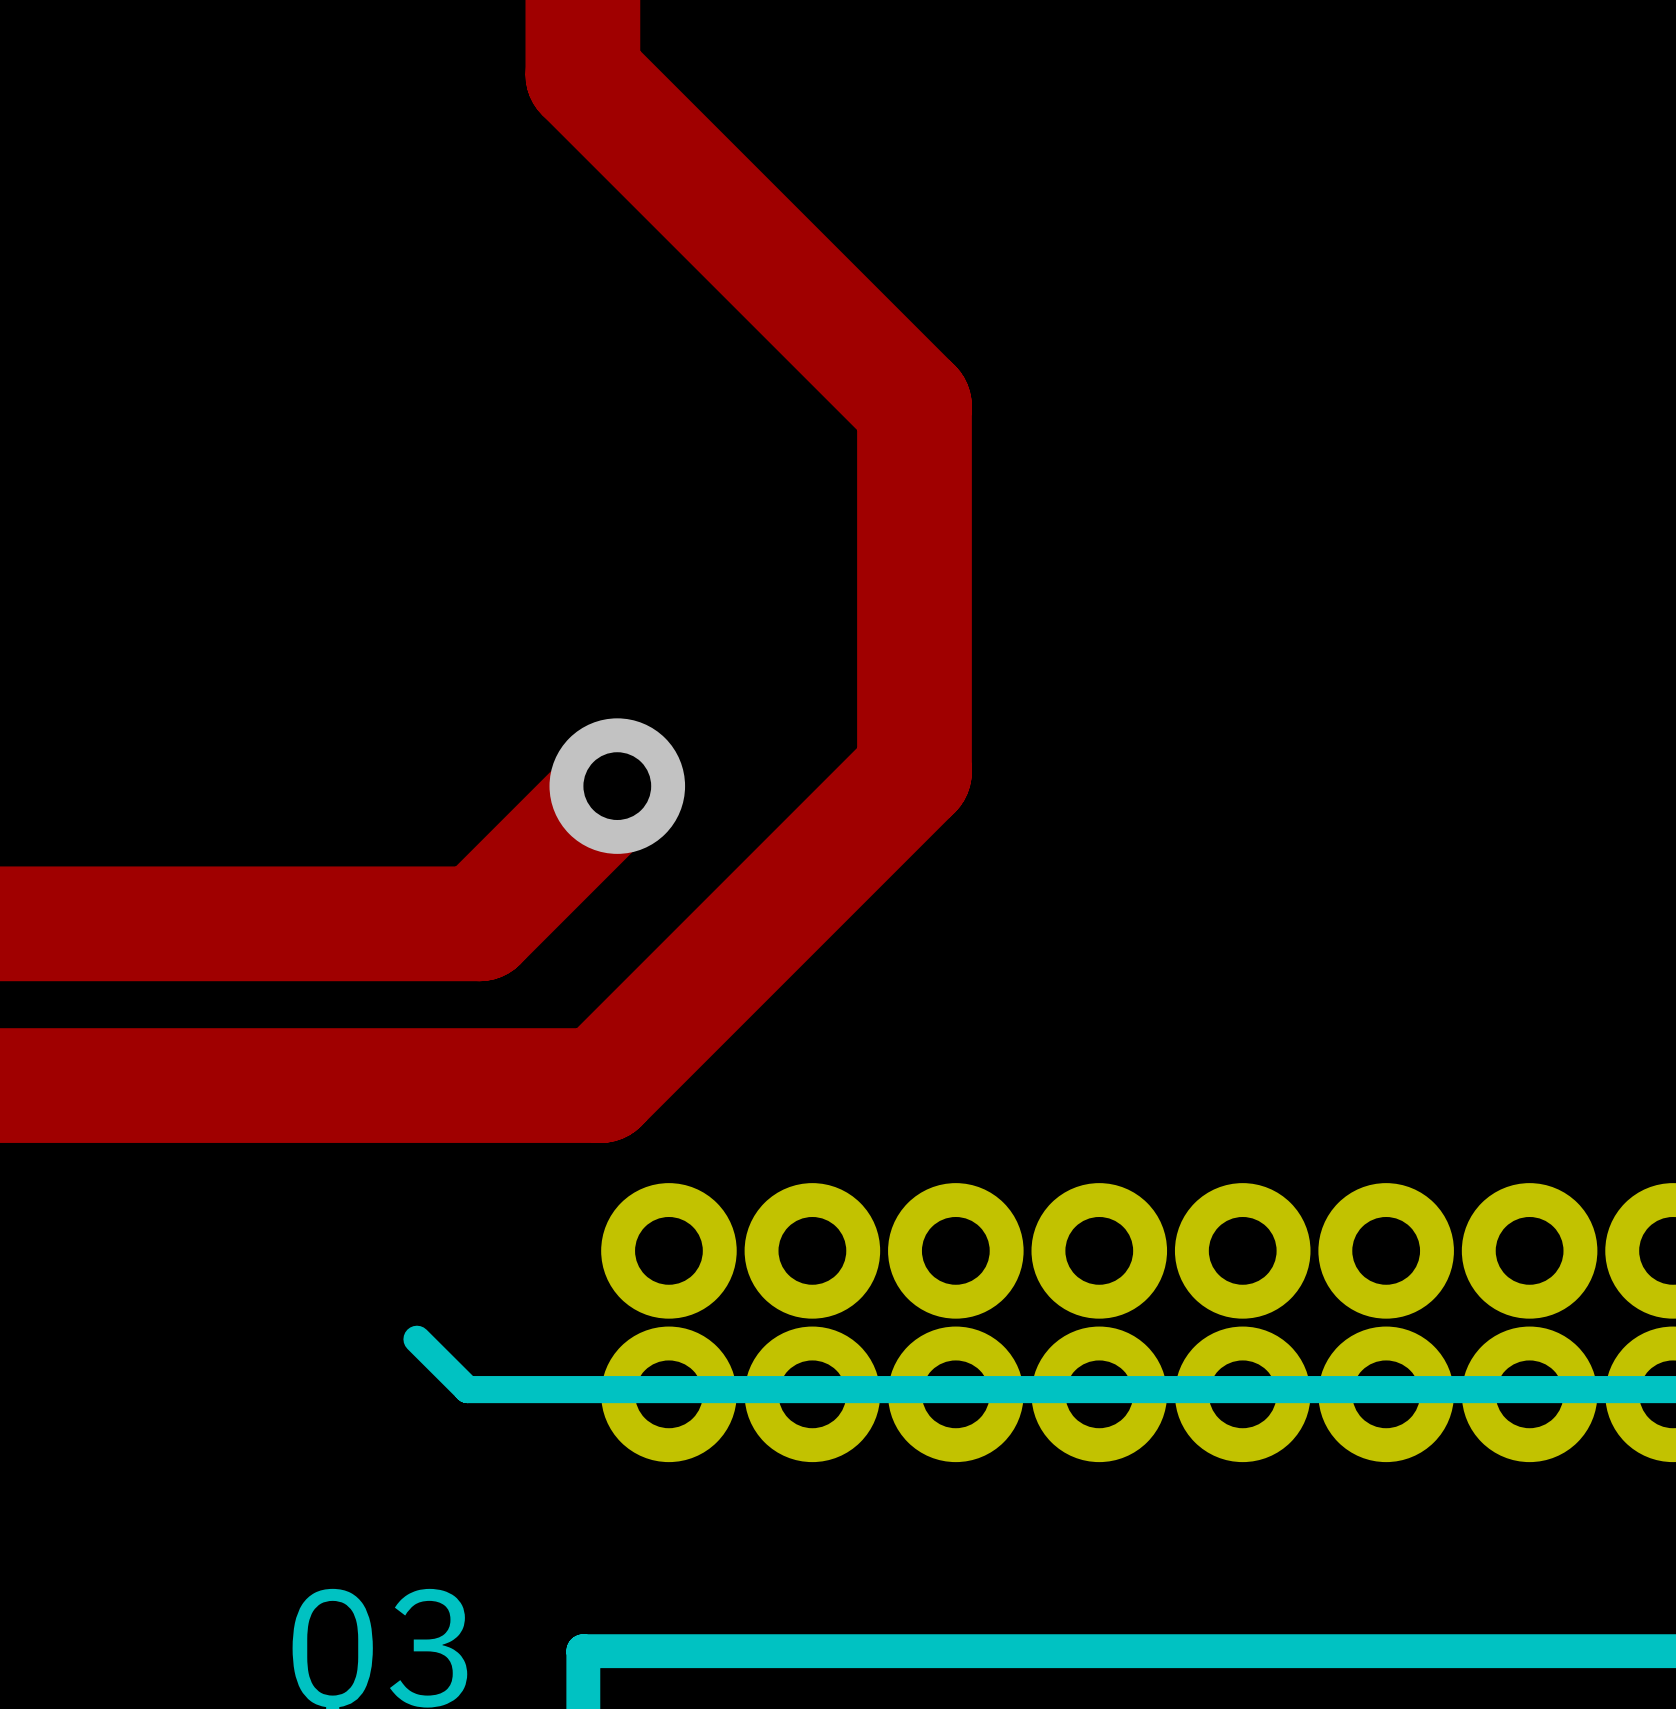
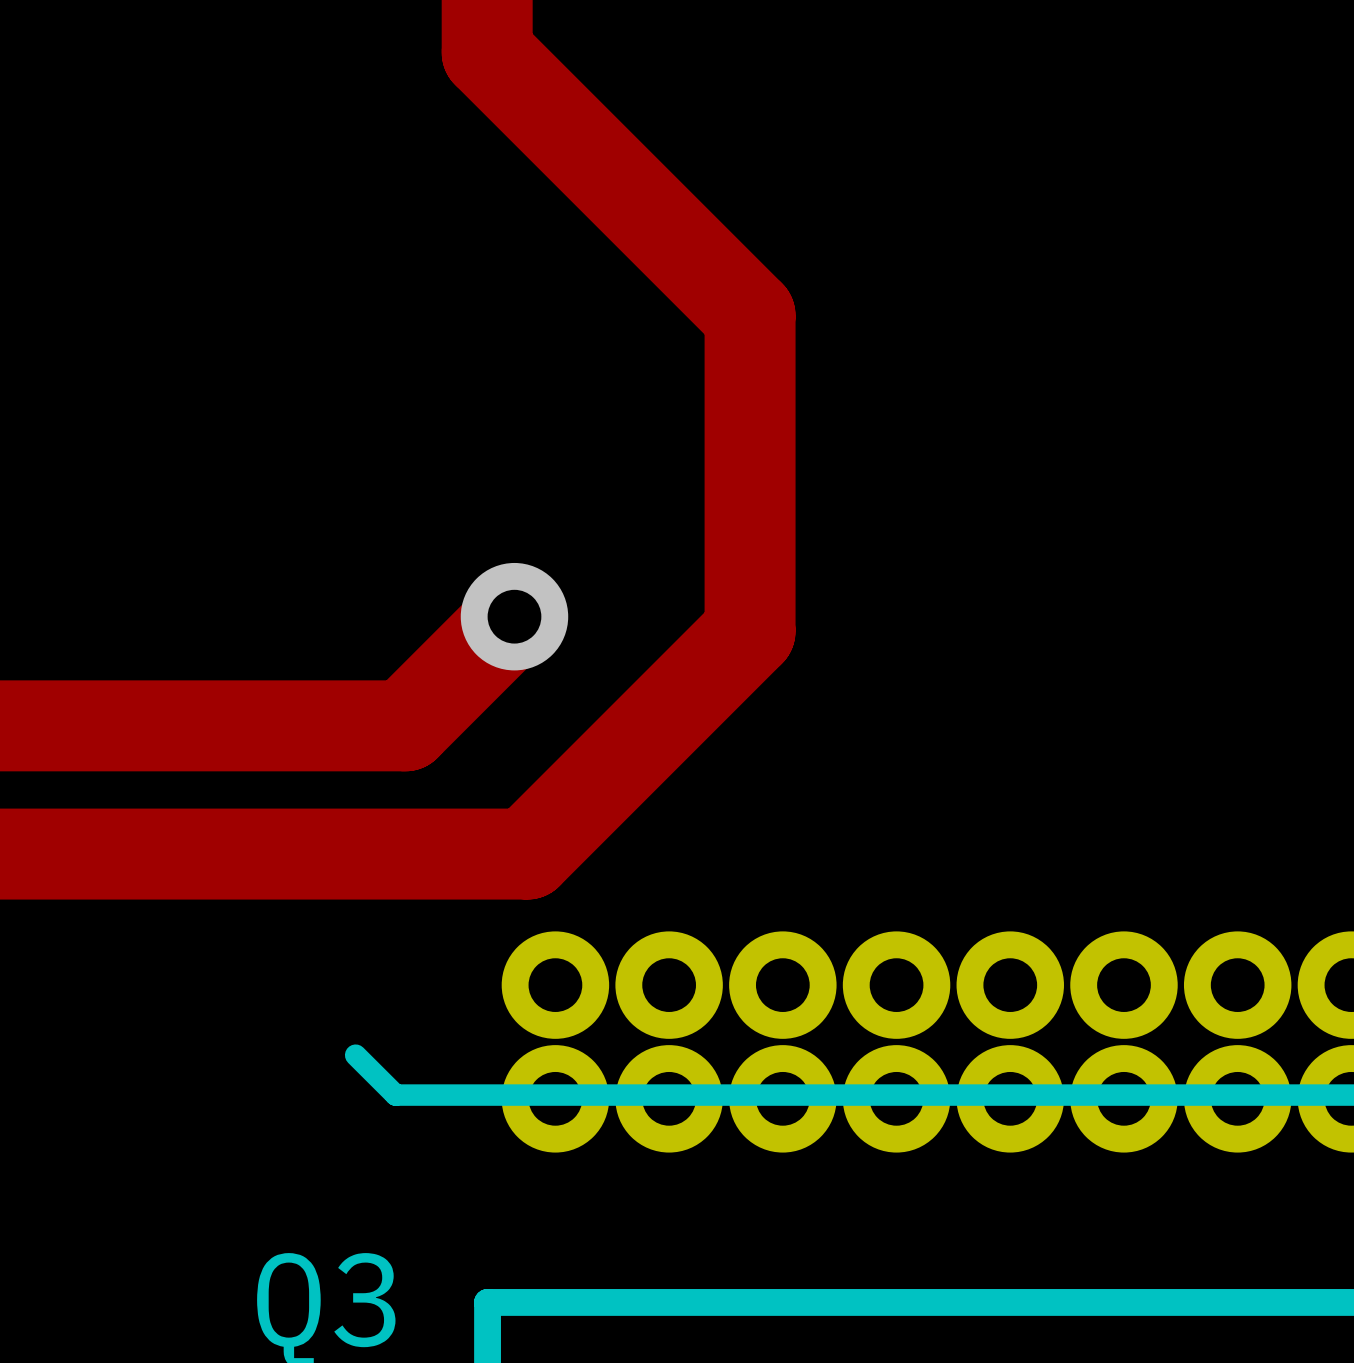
track: (914, 771) (600, 1085) -> (750, 605) (750, 631) (527, 854) (501, 854)

